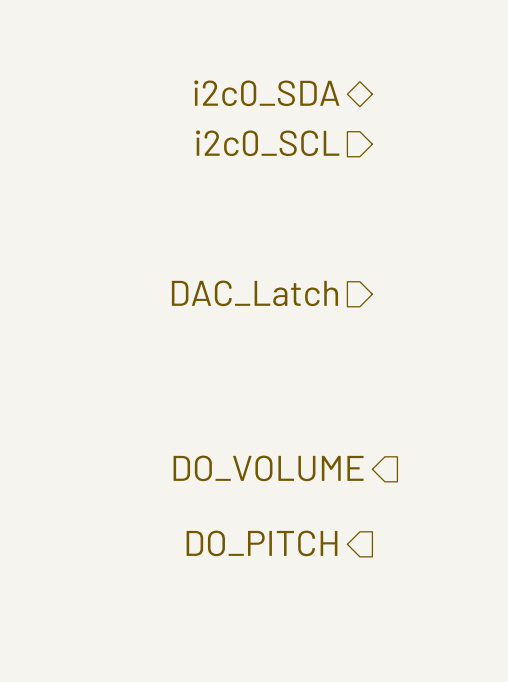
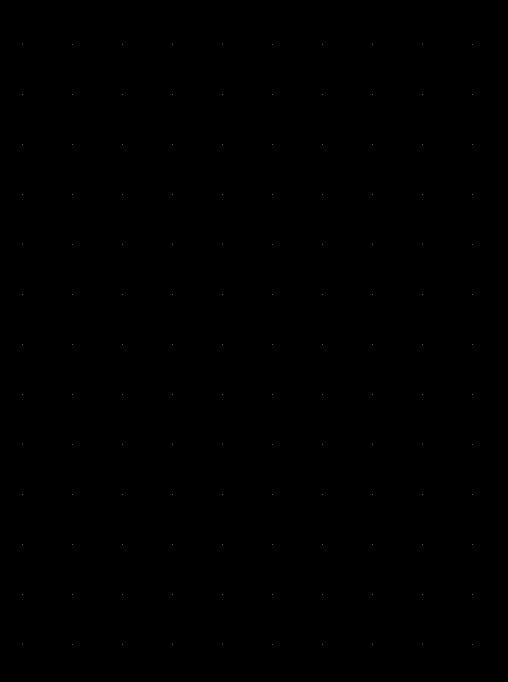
hierarchical label: i2c0_SDA (266, 93) -> none
hierarchical label: i2c0_SCL (267, 143) -> none
hierarchical label: DAC_Latch (254, 293) -> none
hierarchical label: DO_VOLUME (268, 468) -> none
hierarchical label: DO_PITCH (262, 543) -> none

